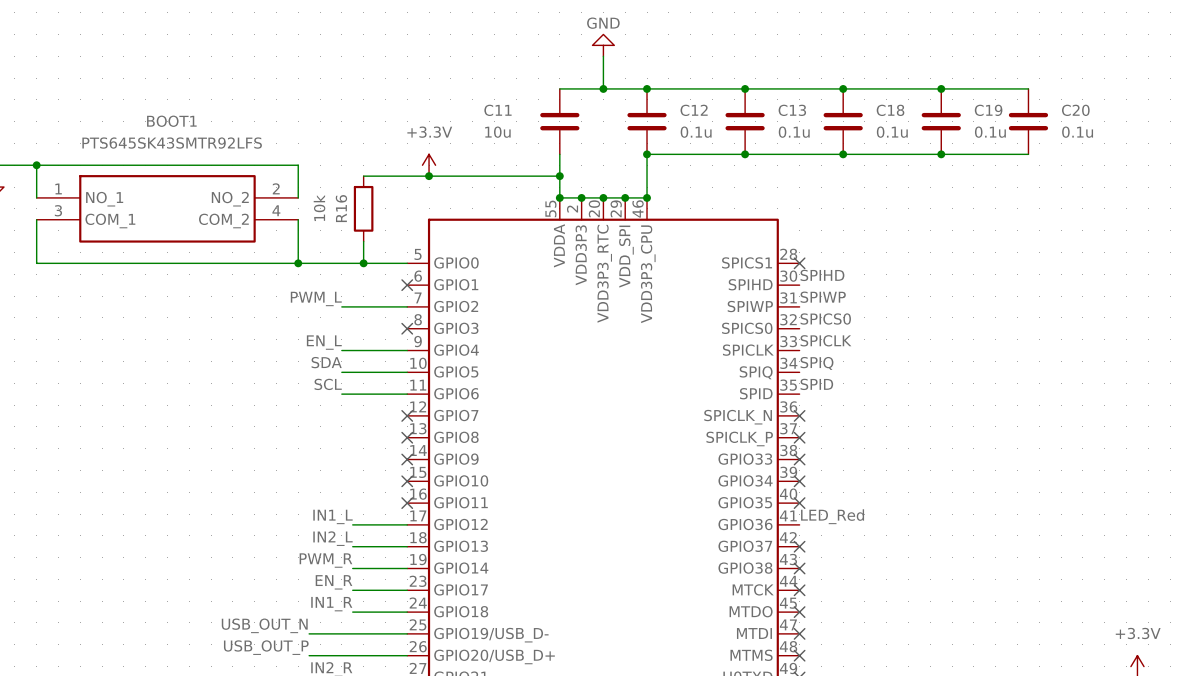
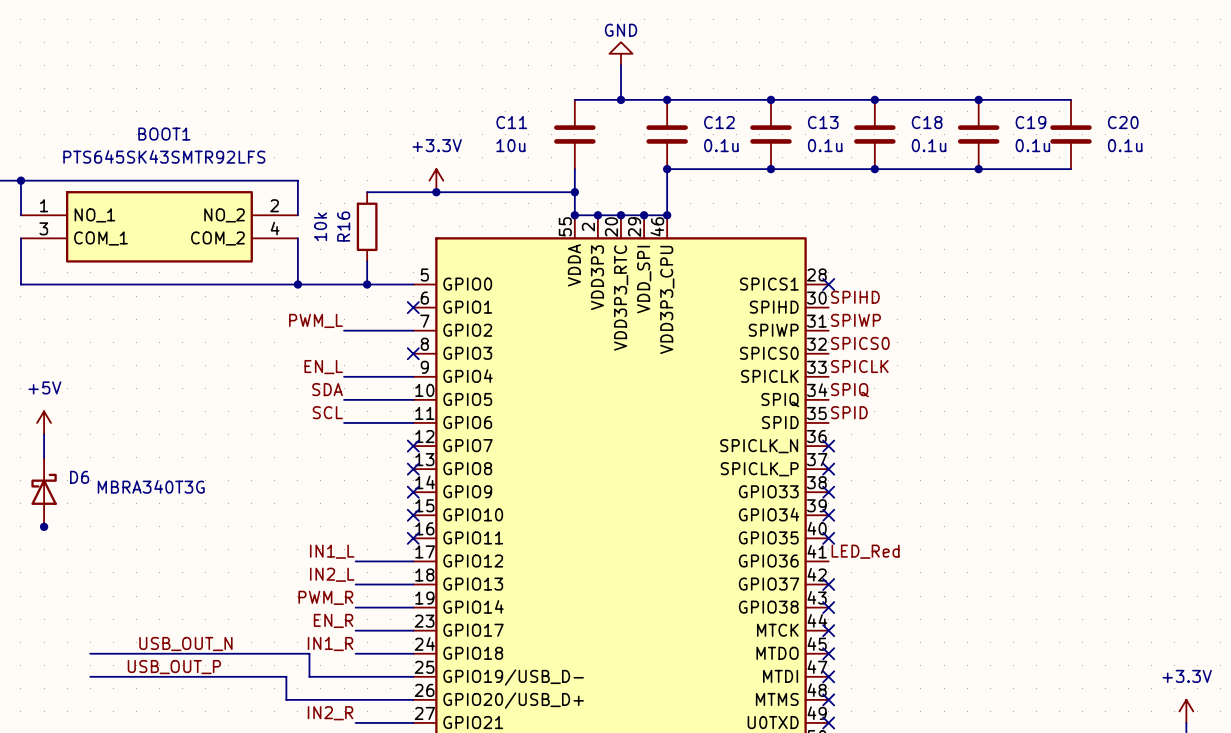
power symbol: none -> +5V (44, 422)
wire: none -> (44, 434) (44, 457)
D6: none -> MBRA340T3G (44, 492)
junction: none -> (44, 526)
wire: none -> (90, 653) (309, 653) (309, 676)
label position: USB_OUT_N (264, 625) -> USB_OUT_N (185, 643)
wire: none -> (90, 676) (286, 676) (286, 699) (309, 699)
label position: USB_OUT_P (266, 647) -> USB_OUT_P (174, 667)

